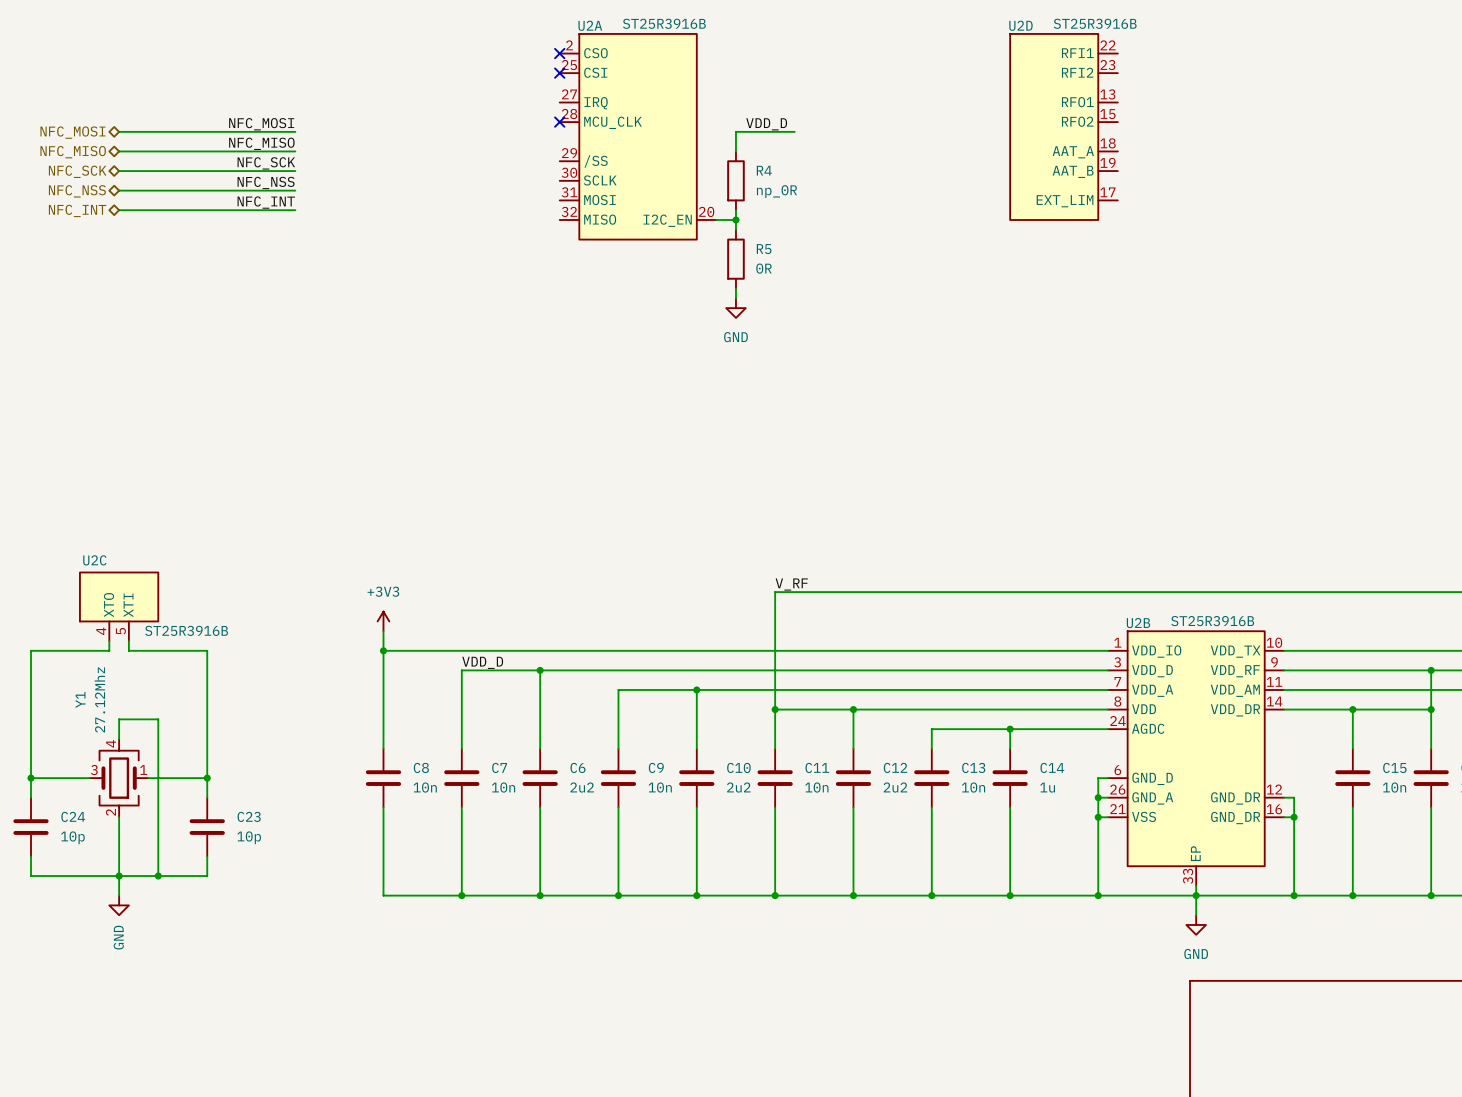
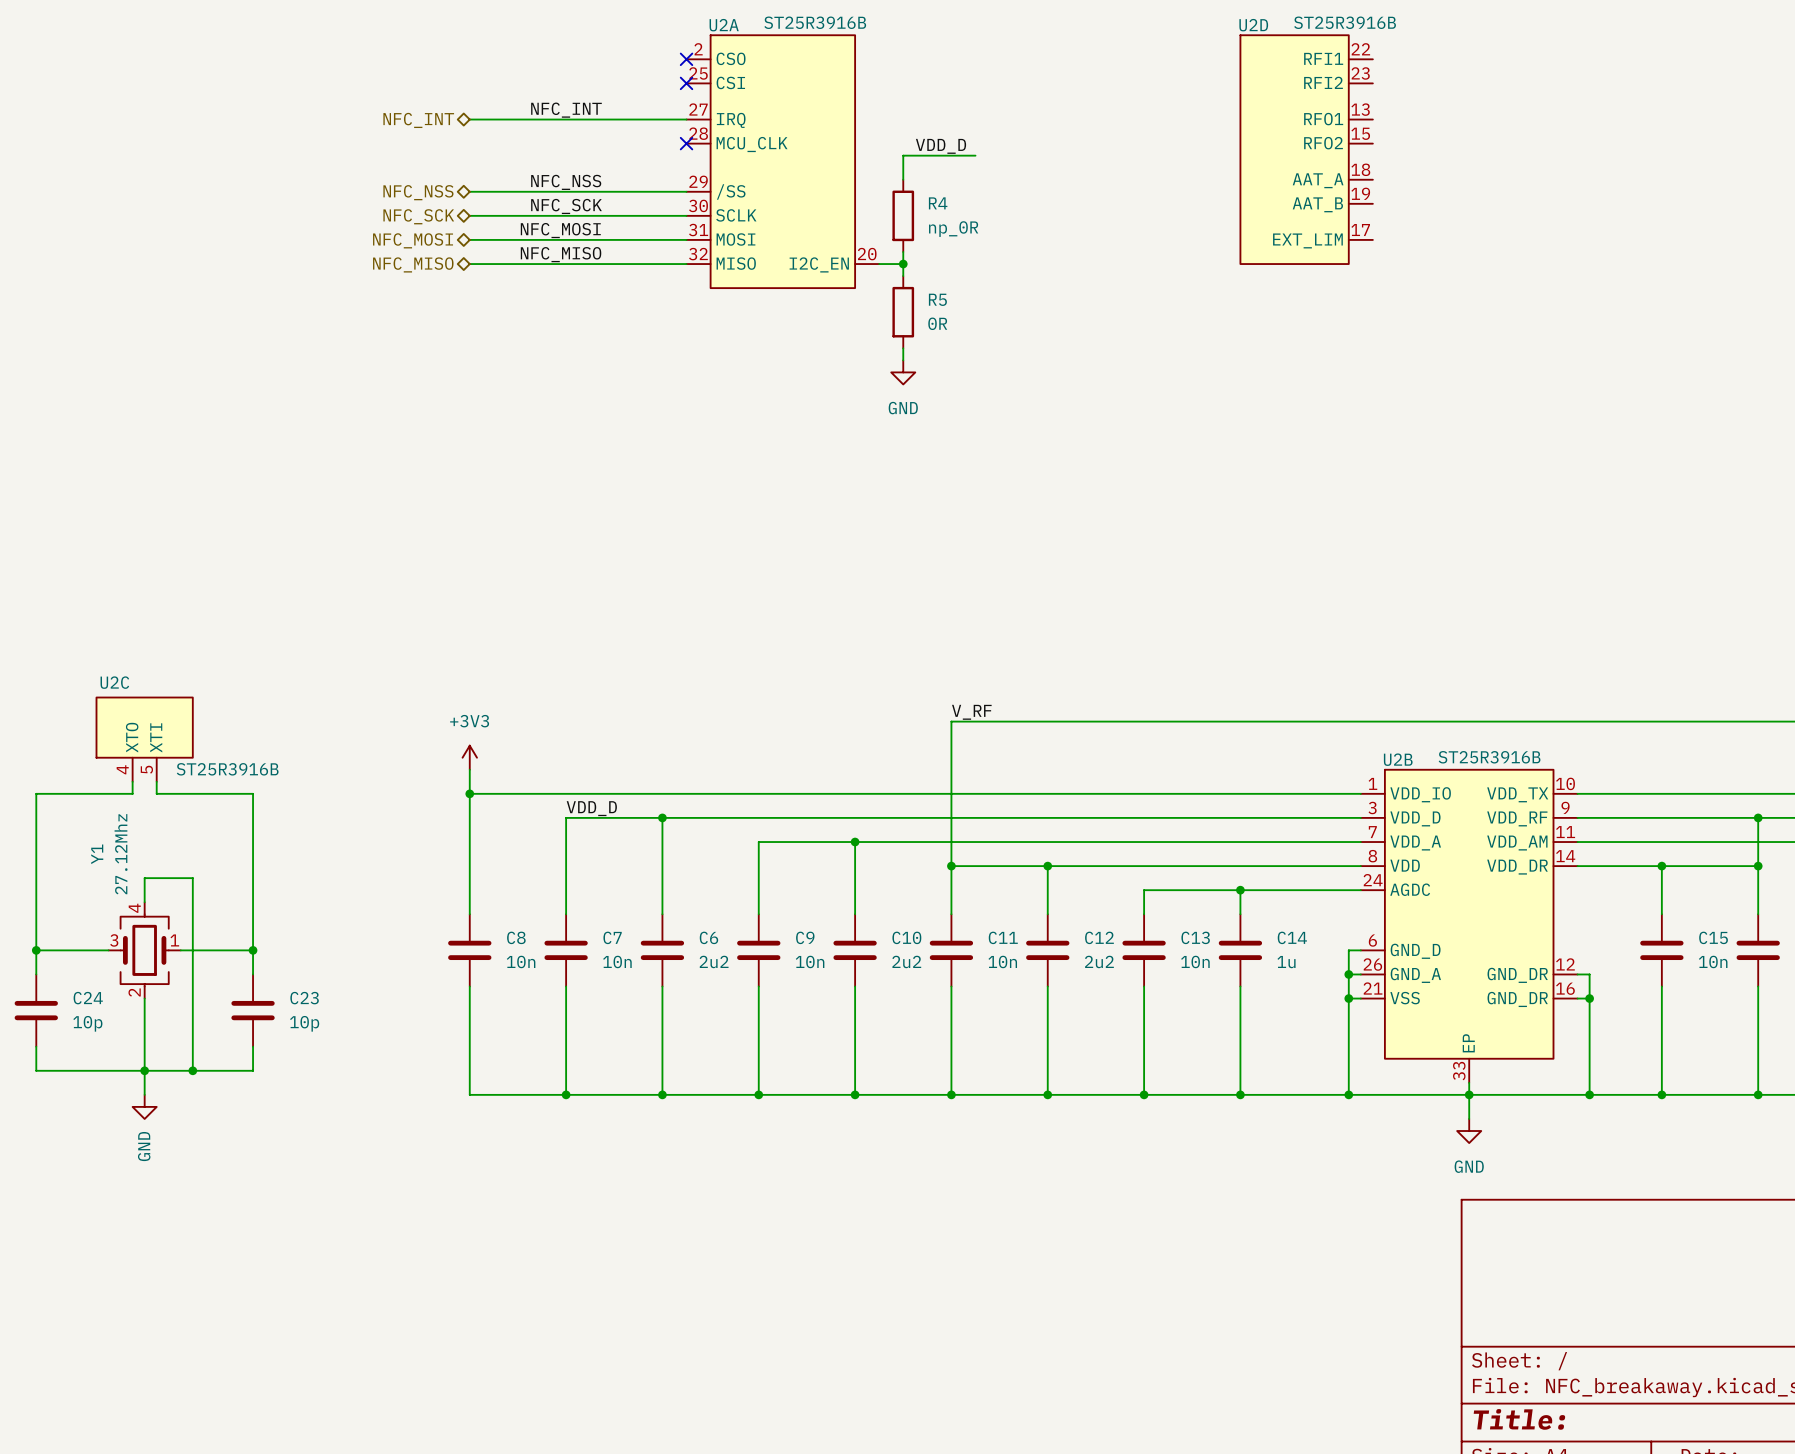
label: none -> NFC_INT (566, 110)
wire: none -> (469, 119) (686, 119)
hierarchical label: none -> NFC_INT (418, 120)
label: NFC_MOSI (261, 124) -> none
wire: (119, 131) (295, 131) -> none
hierarchical label: NFC_MOSI (72, 132) -> none
label: NFC_MISO (261, 143) -> none
wire: (119, 151) (295, 151) -> none
hierarchical label: NFC_MISO (73, 152) -> none
label: none -> NFC_NSS (566, 182)
hierarchical label: none -> NFC_NSS (418, 192)
wire: none -> (469, 191) (686, 191)
label: NFC_SCK (266, 163) -> none
hierarchical label: NFC_SCK (77, 171) -> none
wire: (119, 171) (295, 171) -> none
label: none -> NFC_SCK (566, 206)
wire: none -> (469, 215) (686, 215)
hierarchical label: none -> NFC_SCK (418, 216)
label: NFC_NSS (266, 182) -> none
wire: (119, 190) (295, 190) -> none
hierarchical label: NFC_NSS (77, 191) -> none
label: none -> NFC_MOSI (560, 230)
wire: none -> (469, 239) (686, 239)
hierarchical label: none -> NFC_MOSI (413, 240)
label: NFC_INT (266, 202) -> none
hierarchical label: NFC_INT (77, 210) -> none
wire: (119, 210) (295, 210) -> none
label: none -> NFC_MISO (561, 254)
hierarchical label: none -> NFC_MISO (413, 264)
wire: none -> (469, 264) (686, 264)

